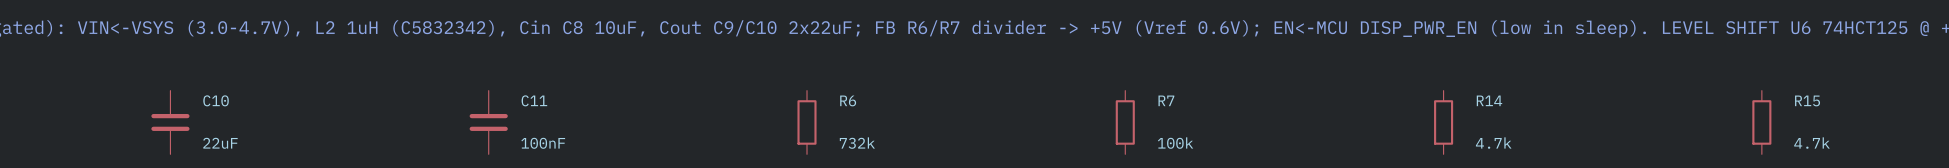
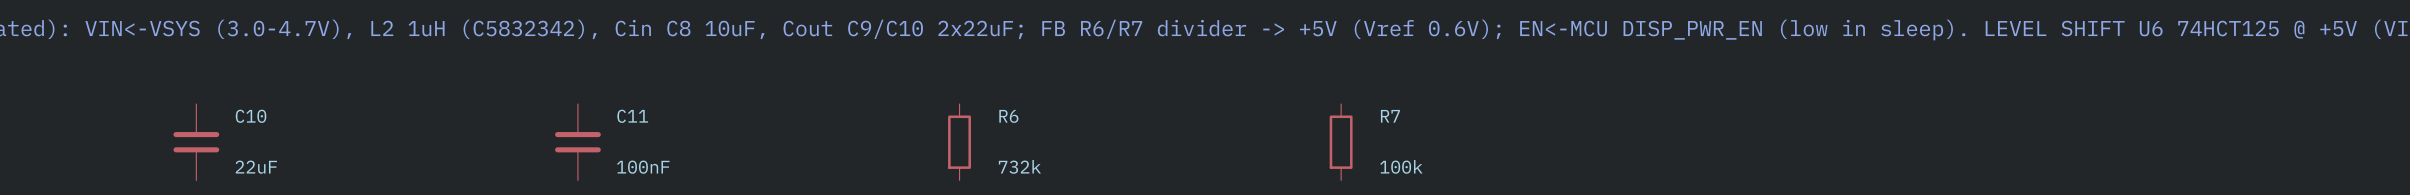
R14: 4.7k (1443, 122) -> none
R15: 4.7k (1761, 122) -> none

